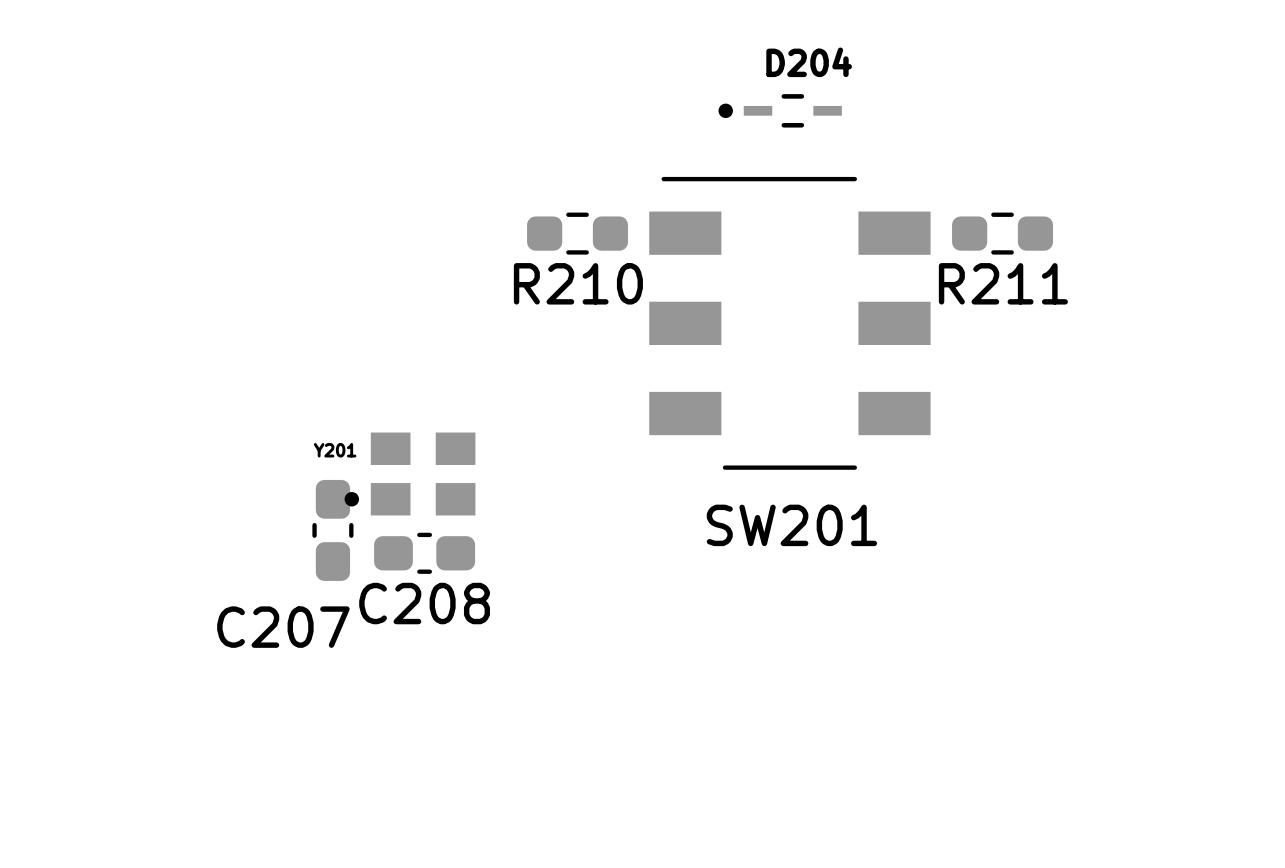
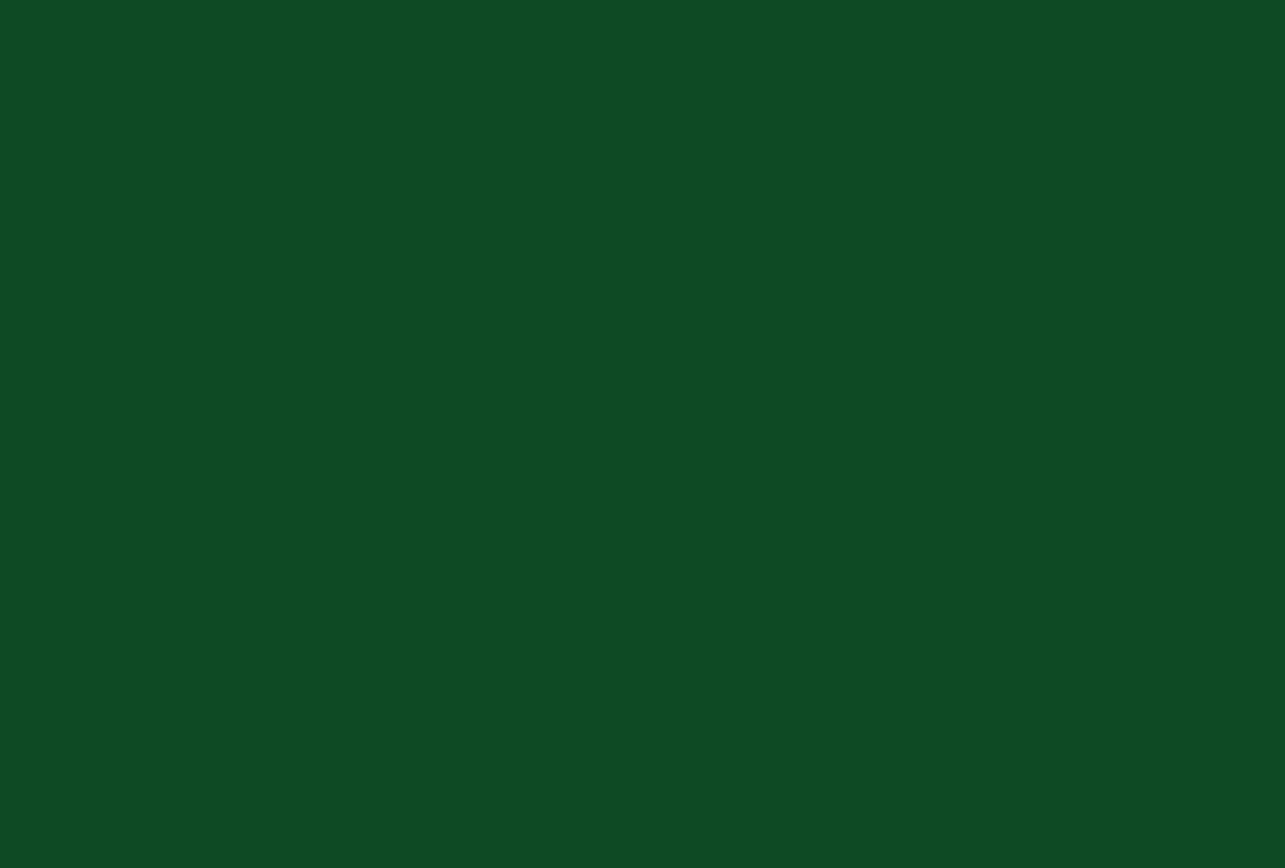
D204: (780, 110) -> none
R210: (577, 233) -> none
R211: (1002, 233) -> none
SW201: (789, 323) -> none
Y201: (410, 474) -> none
C207: (332, 530) -> none
C208: (424, 553) -> none

